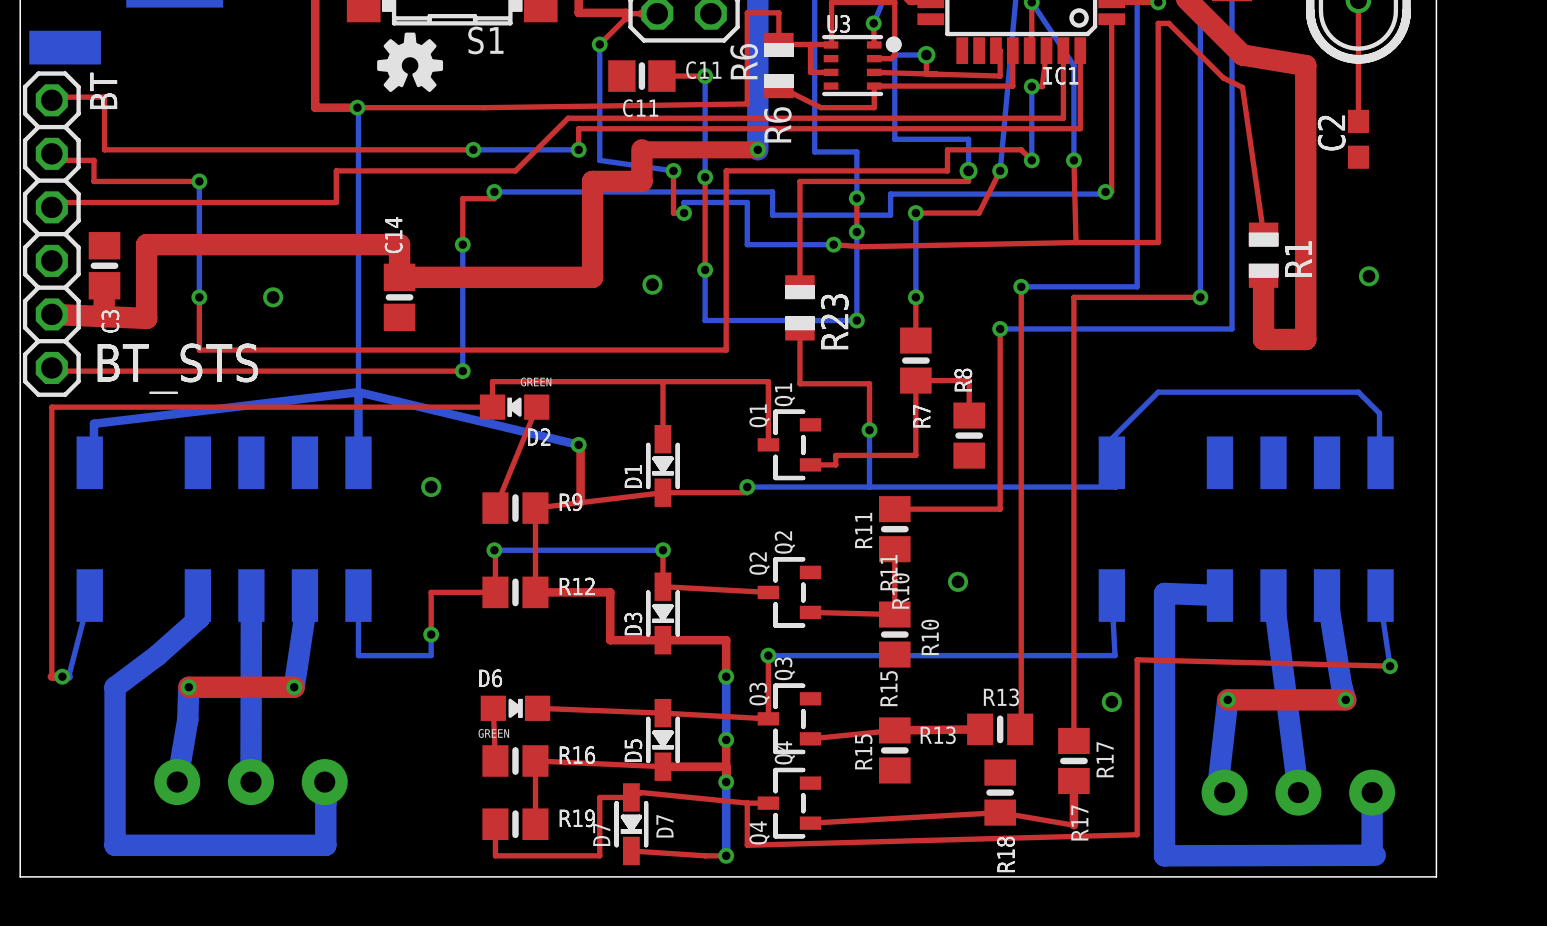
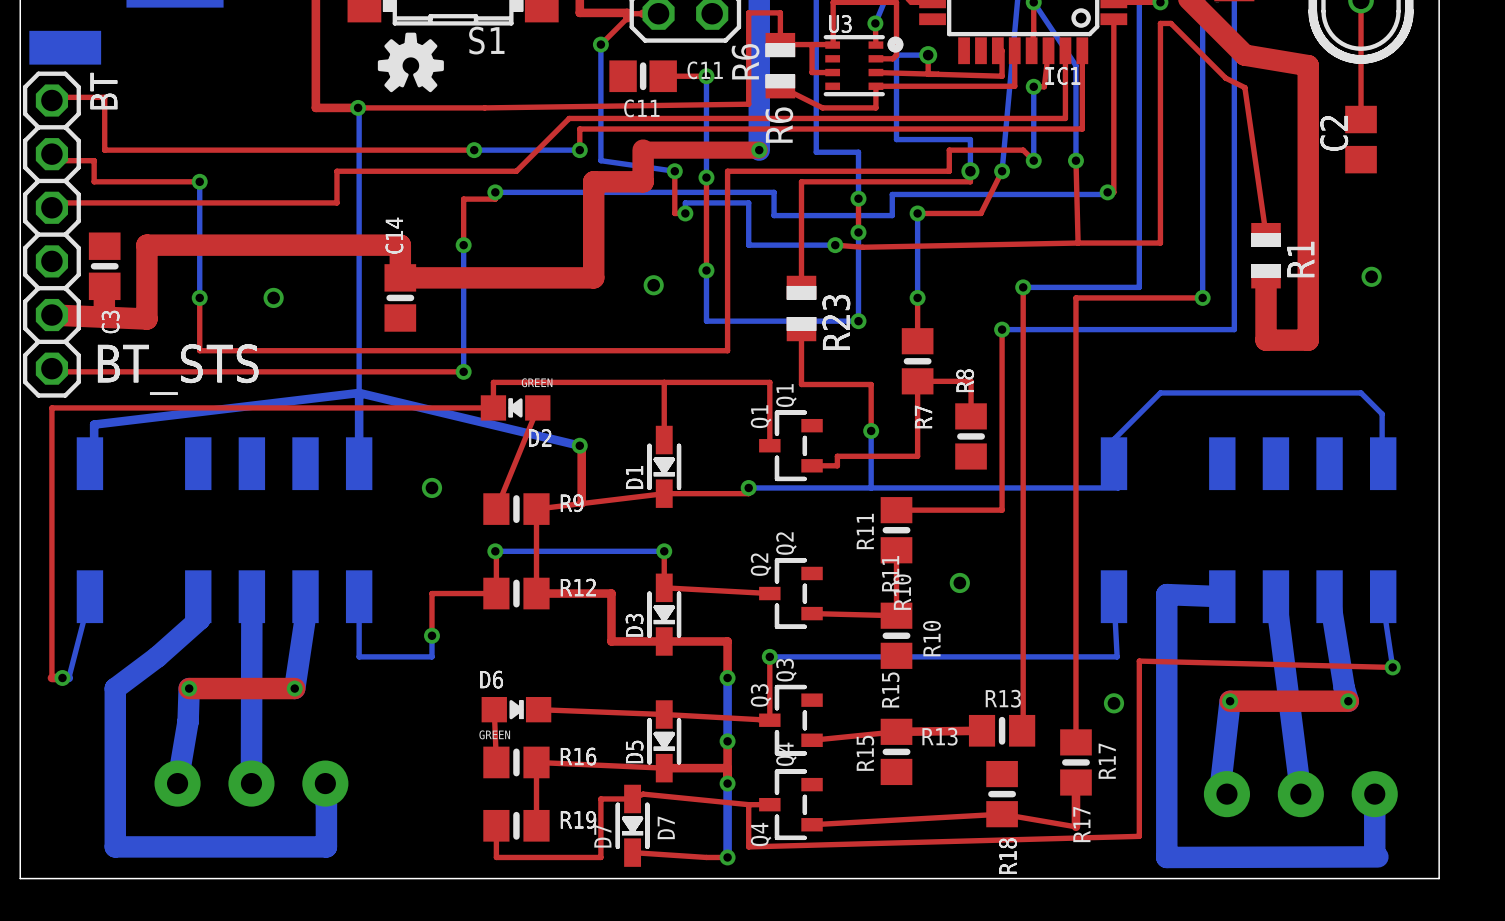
part footprint: [1347, 109, 1369, 169] -> [1345, 105, 1377, 174]

